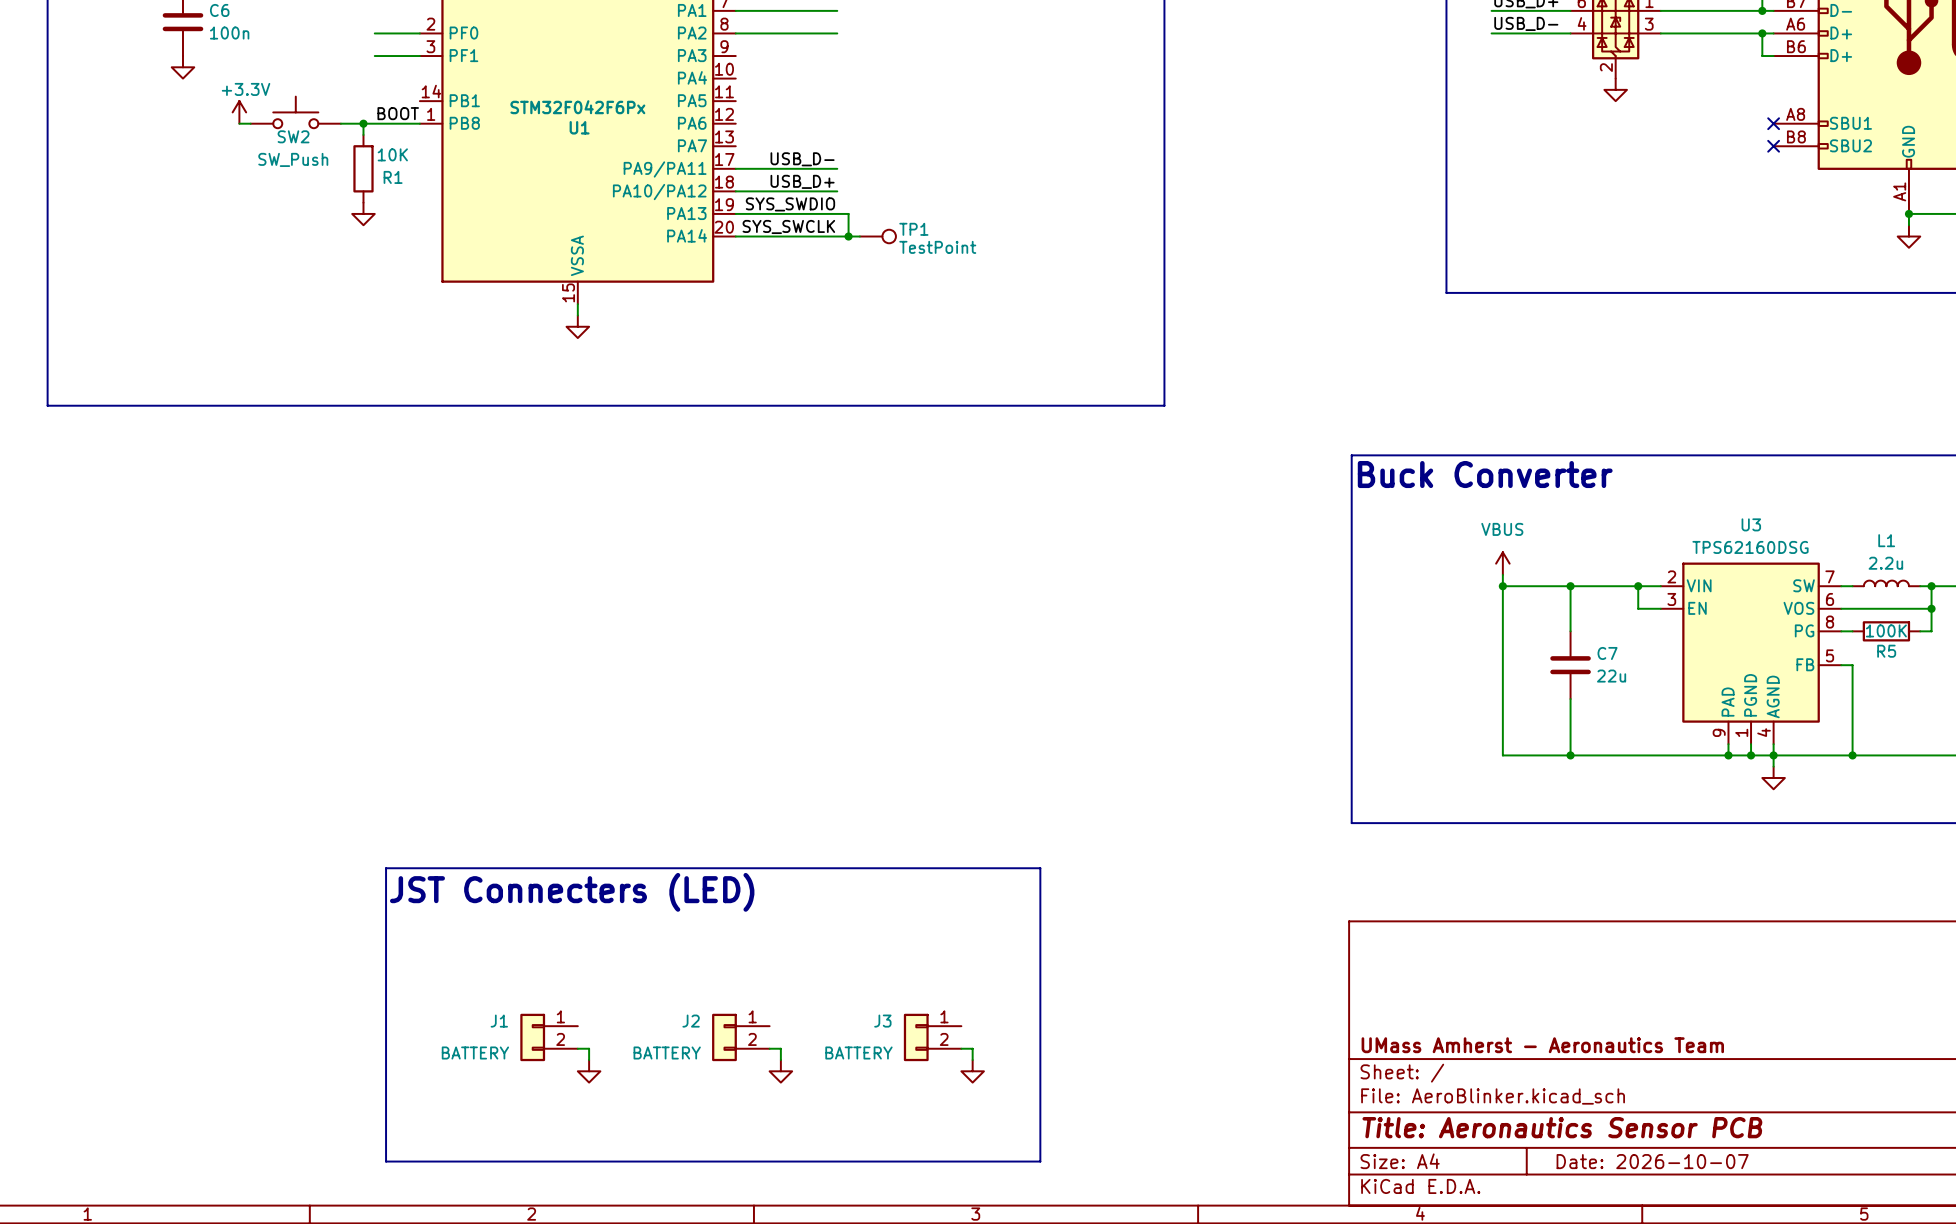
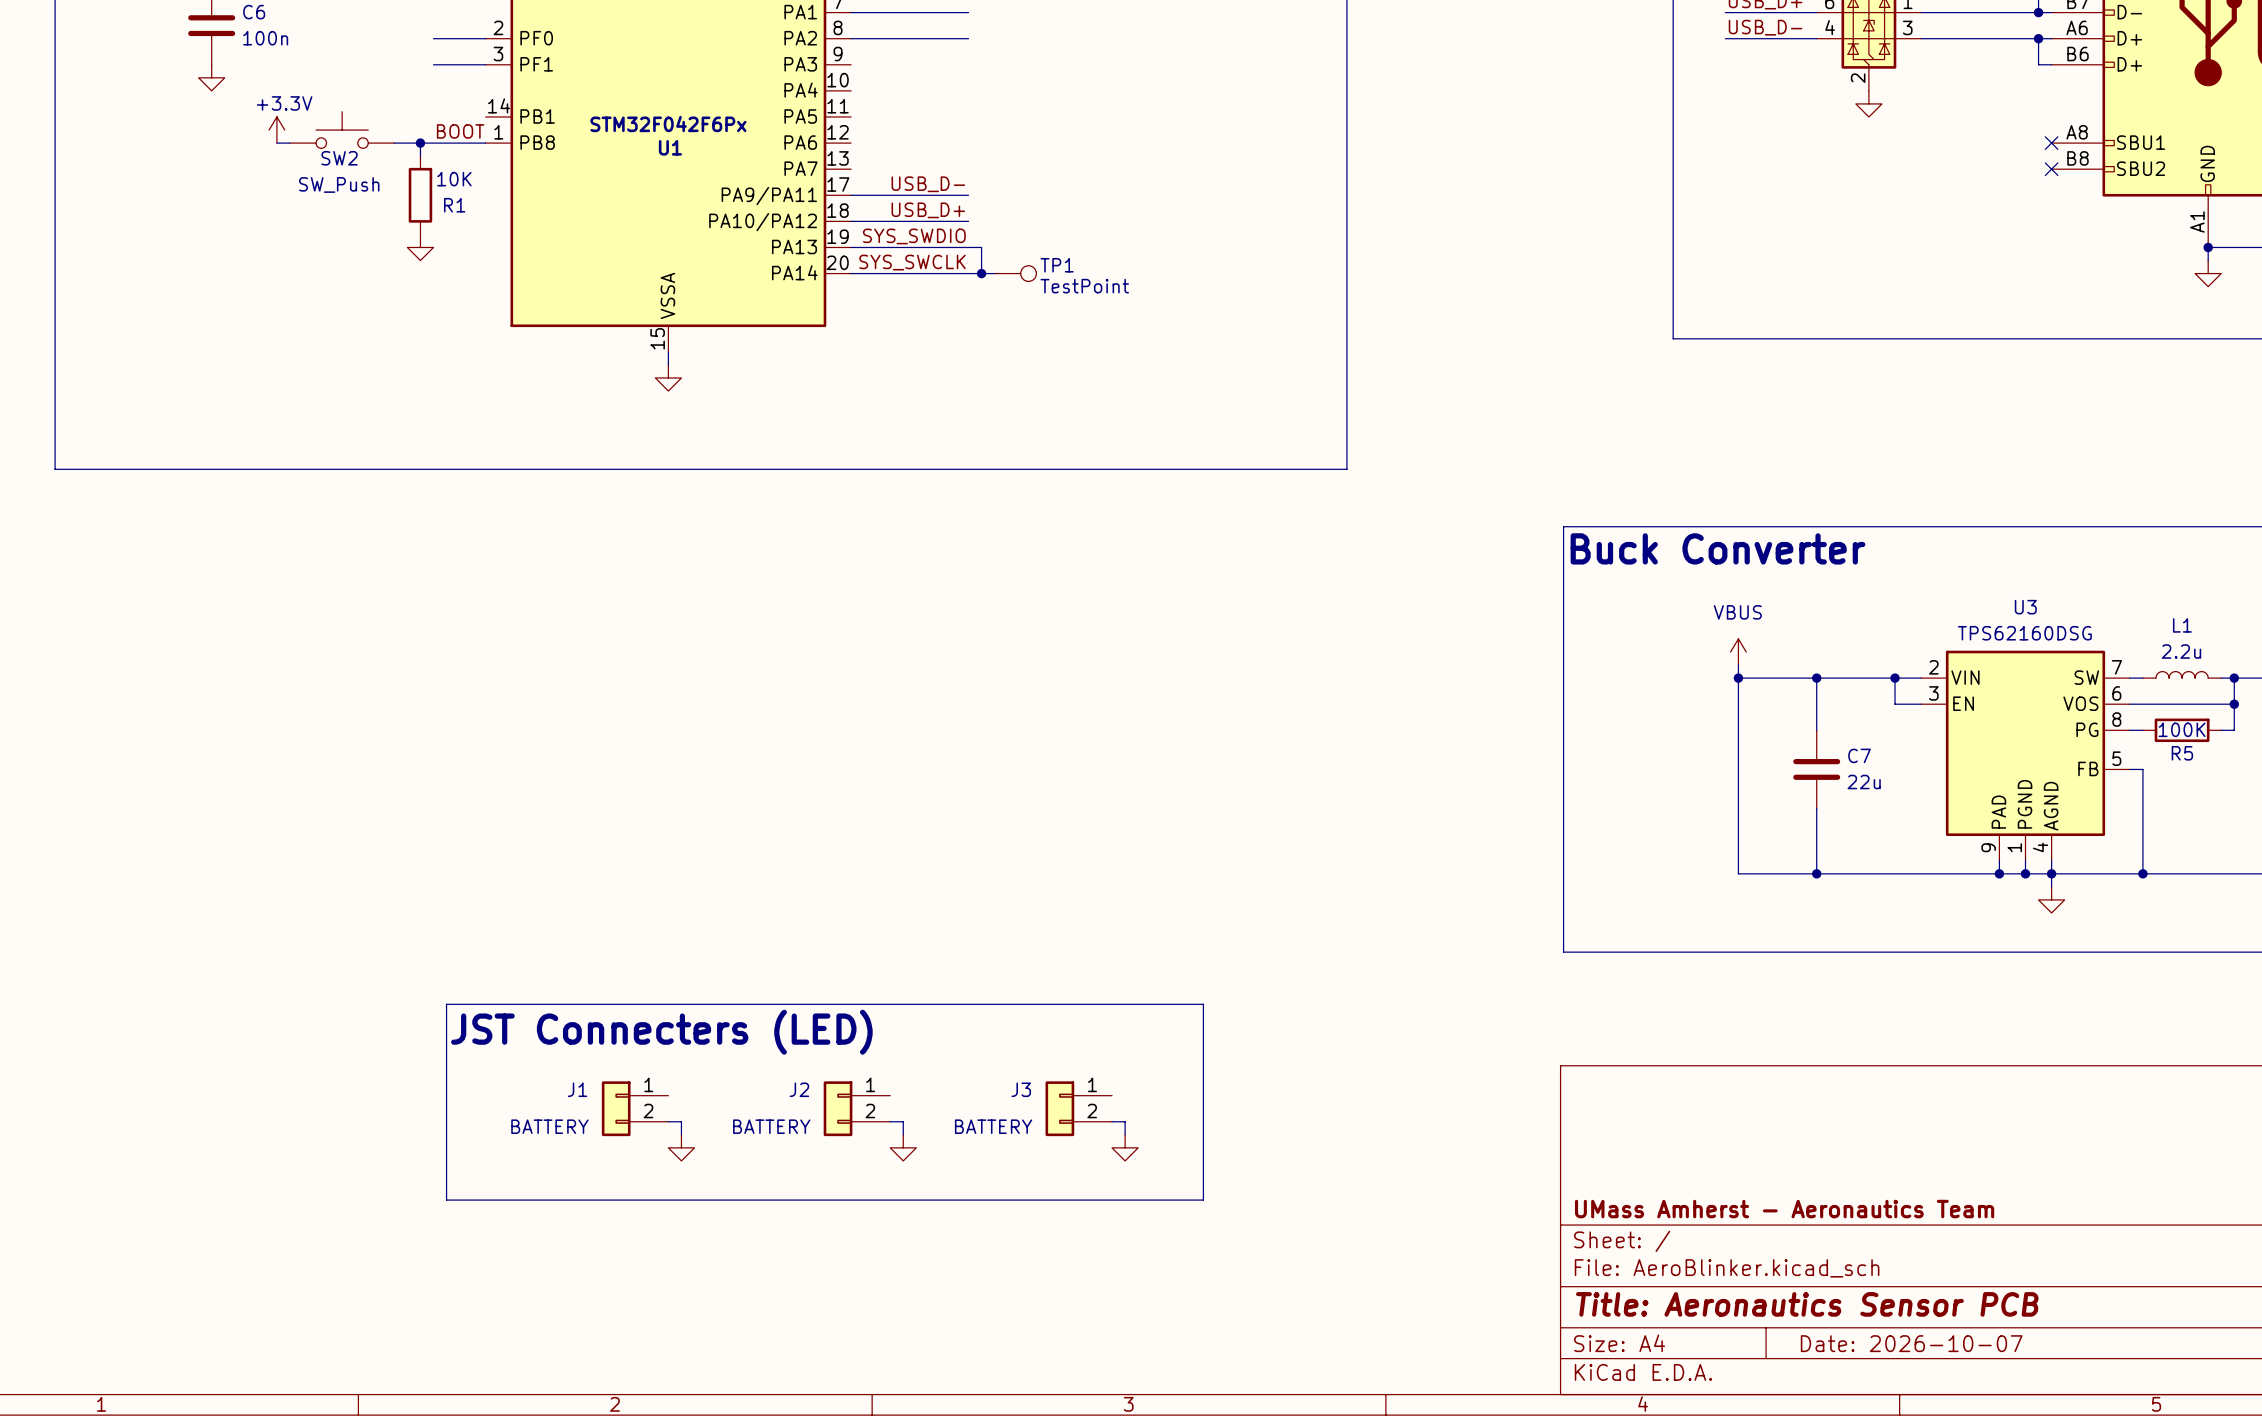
line: (386, 1037) (386, 1161) (1040, 1161) (1040, 1037) -> (446, 1200) (1203, 1200)
J1 position: (549, 1037) -> (635, 1108)
J2 position: (740, 1037) -> (856, 1108)
J3 position: (932, 1037) -> (1078, 1108)
wire: (577, 1048) (589, 1048) (589, 1060) -> (668, 1121) (681, 1121) (681, 1134)
wire: (769, 1048) (780, 1048) (780, 1060) -> (890, 1121) (903, 1121) (903, 1134)
wire: (961, 1048) (972, 1048) (972, 1060) -> (1112, 1121) (1125, 1121) (1125, 1134)
power symbol position: (589, 1071) -> (681, 1147)
power symbol position: (780, 1071) -> (903, 1147)
power symbol position: (972, 1071) -> (1125, 1147)

